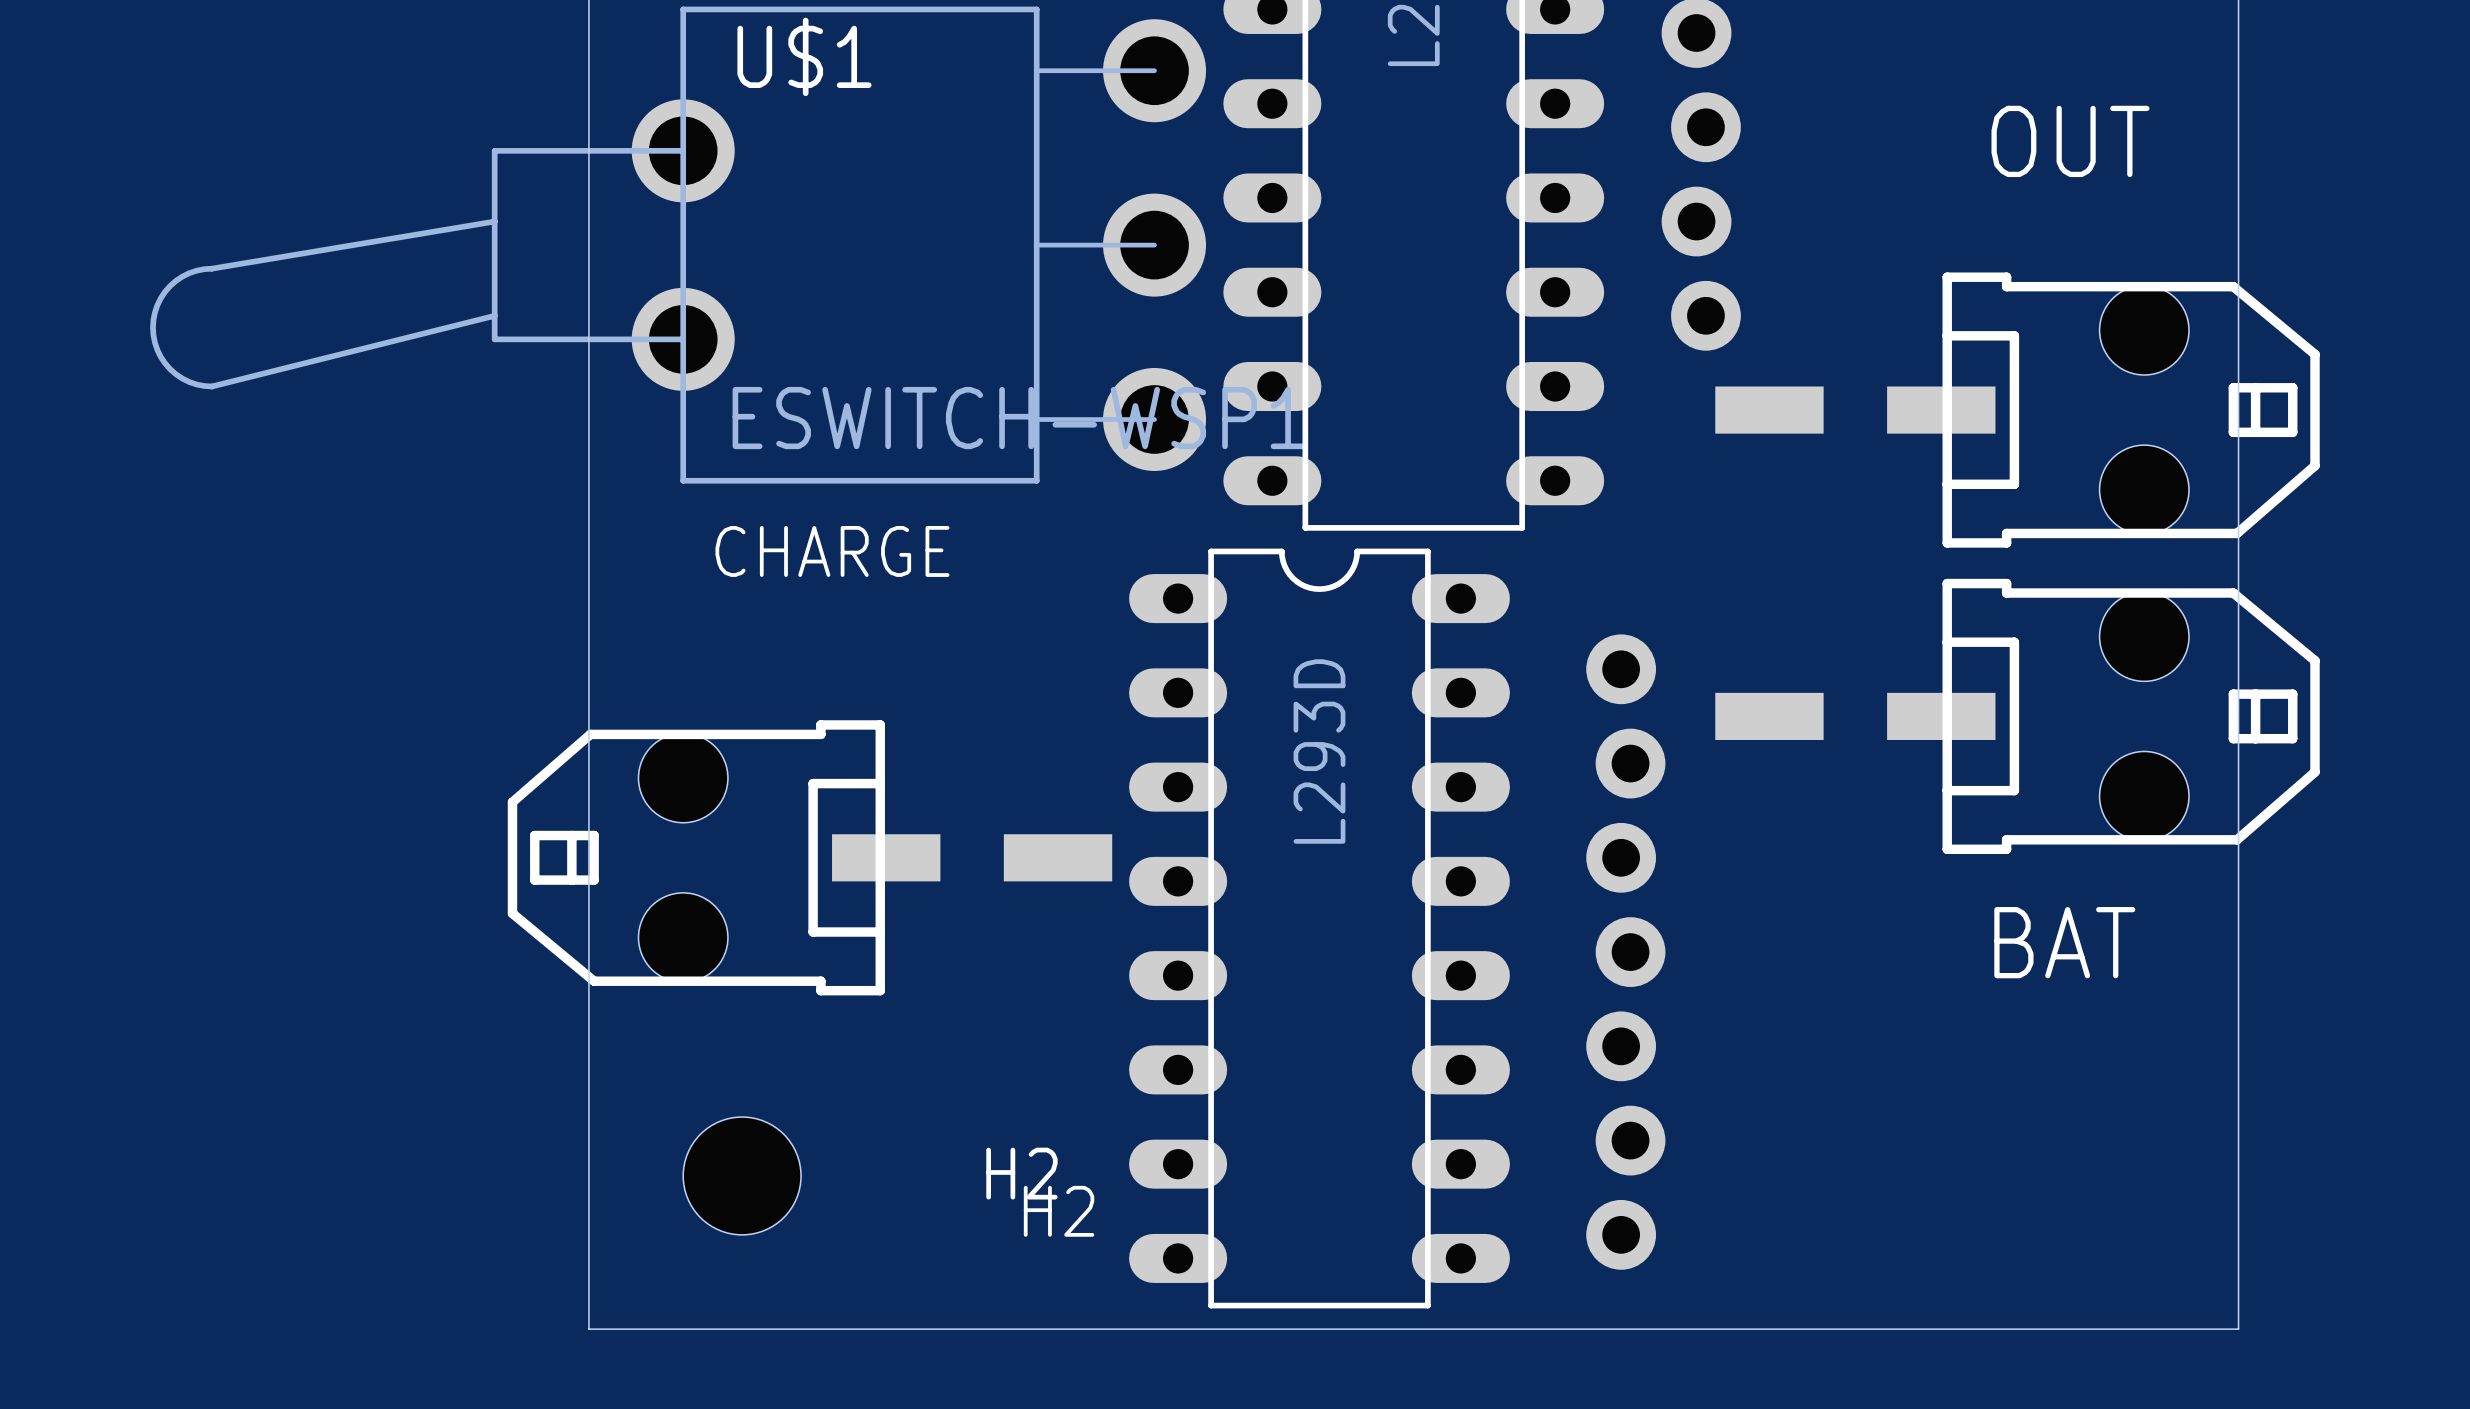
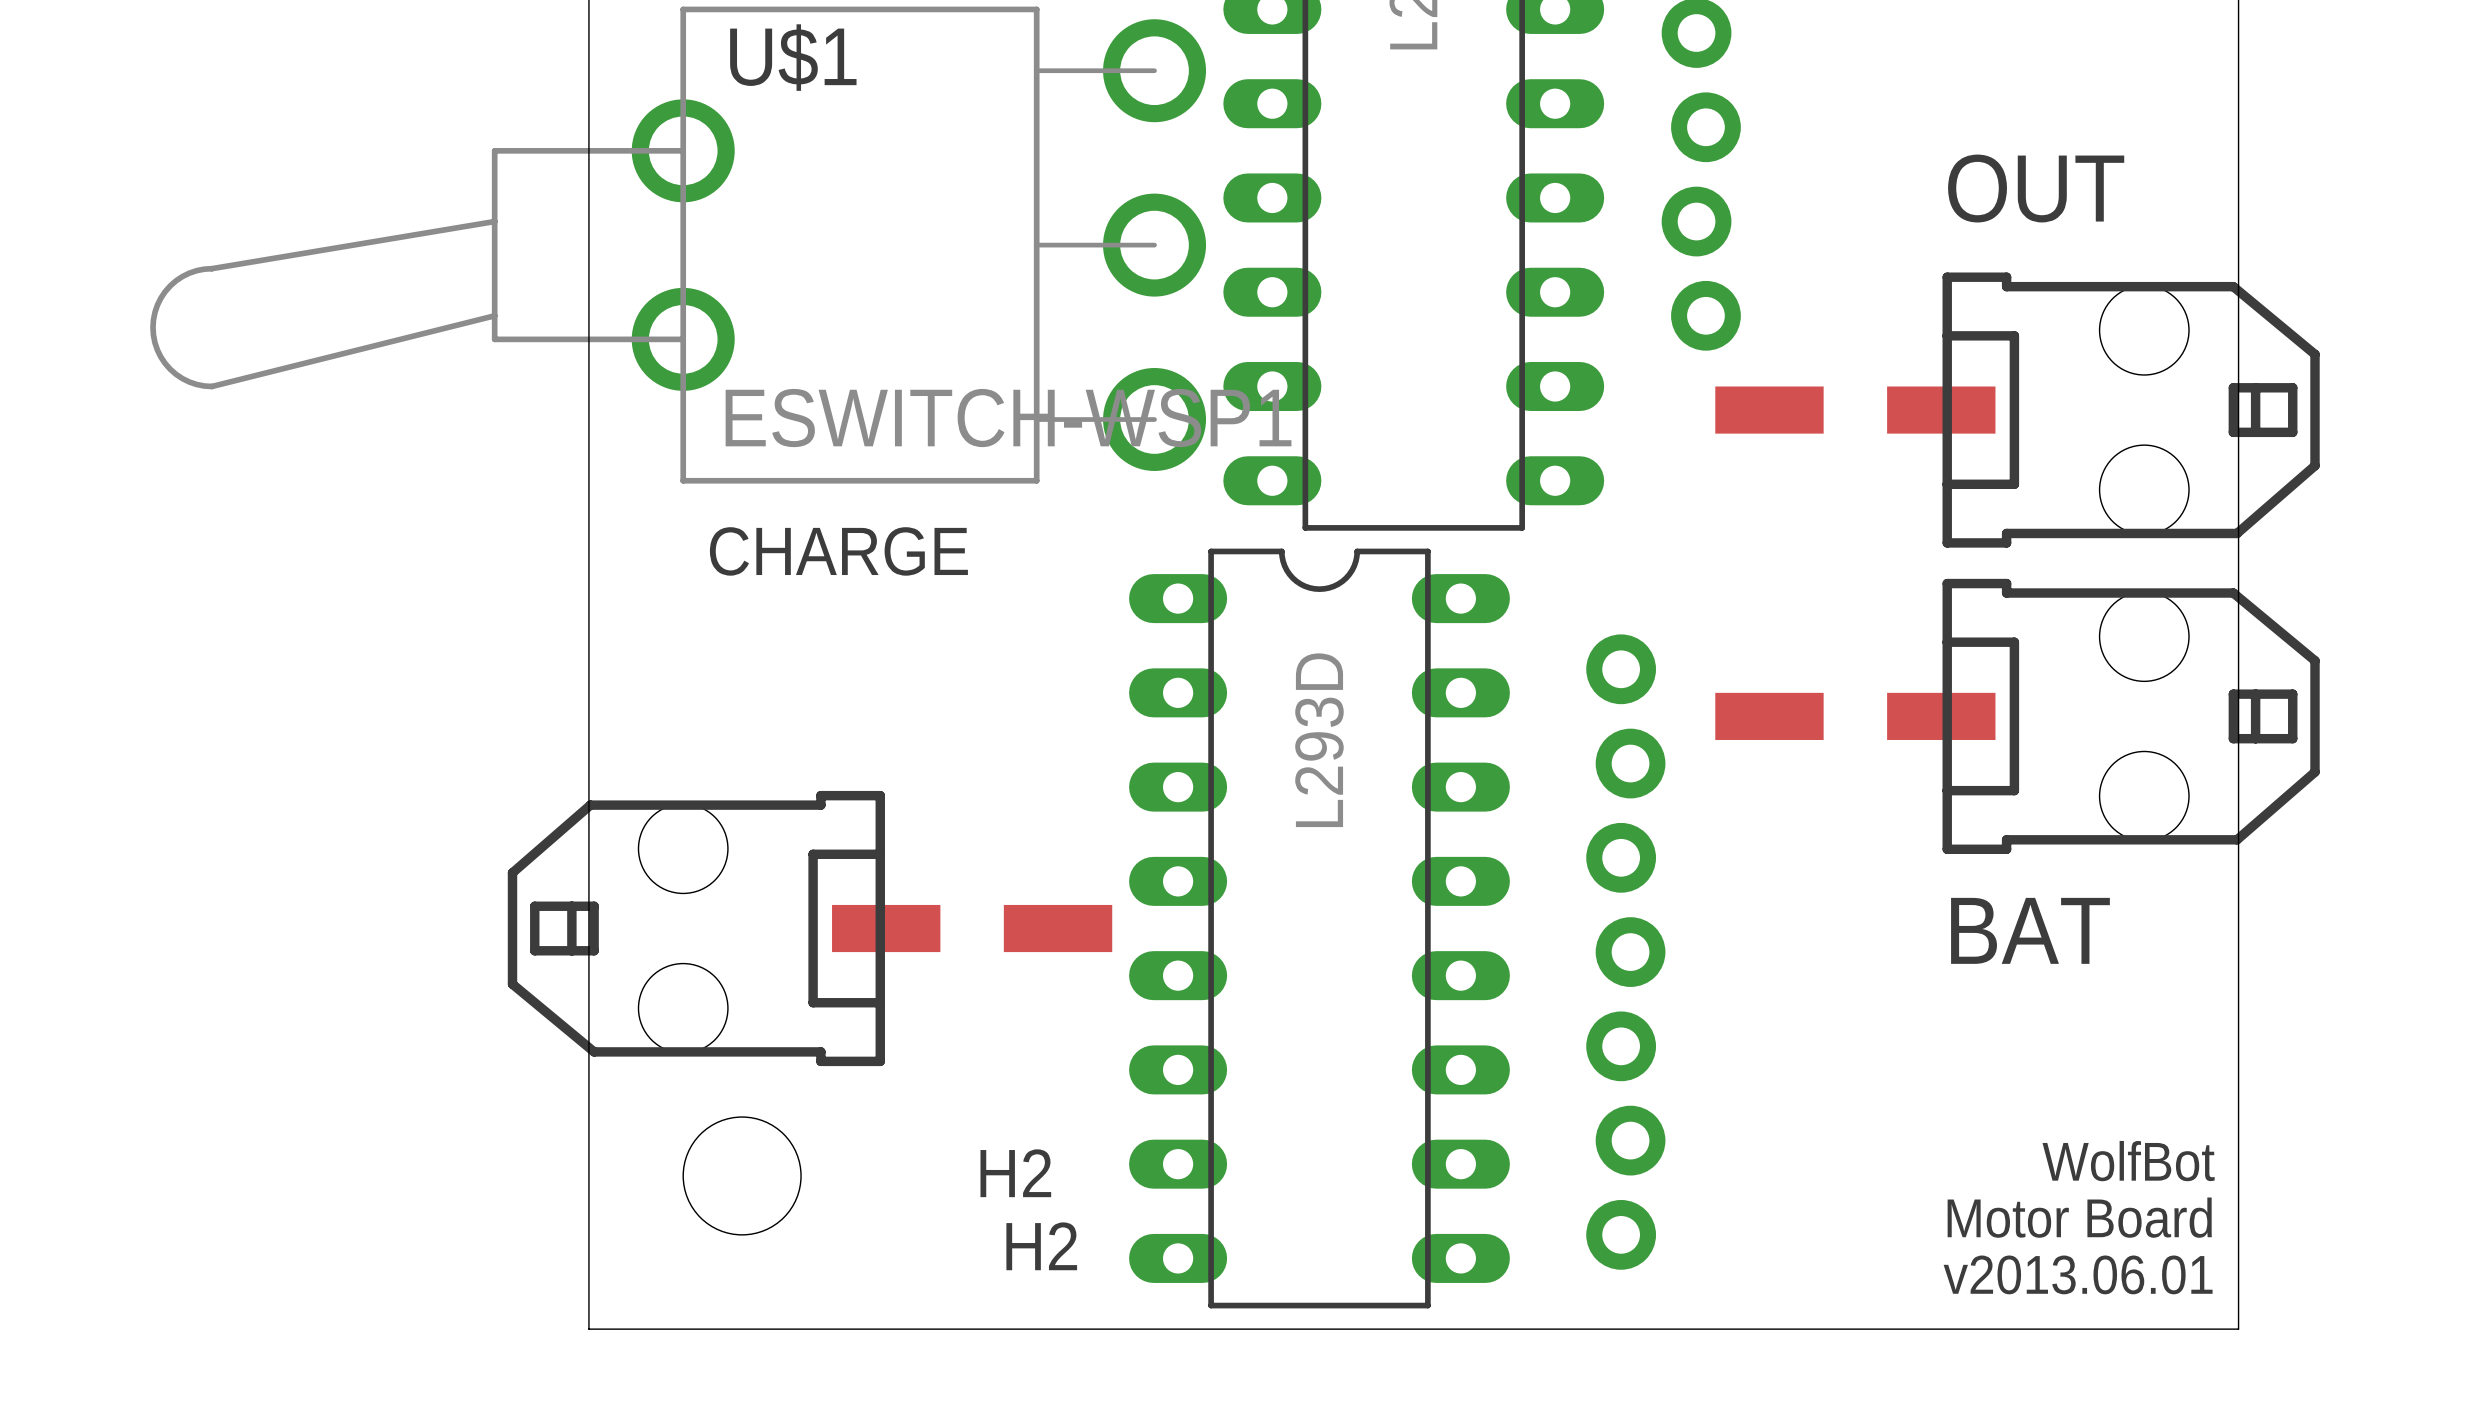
text position: OUT (2070, 141) -> OUT (2036, 188)
part position: (810, 857) -> (810, 928)
text position: BAT (2064, 942) -> BAT (2030, 930)
text: none -> WolfBot (2128, 1161)
text position: H2 (1059, 1211) -> H2 (1041, 1246)
text: none -> Motor Board (2079, 1217)
text: none -> v2013.06.01 (2078, 1274)

